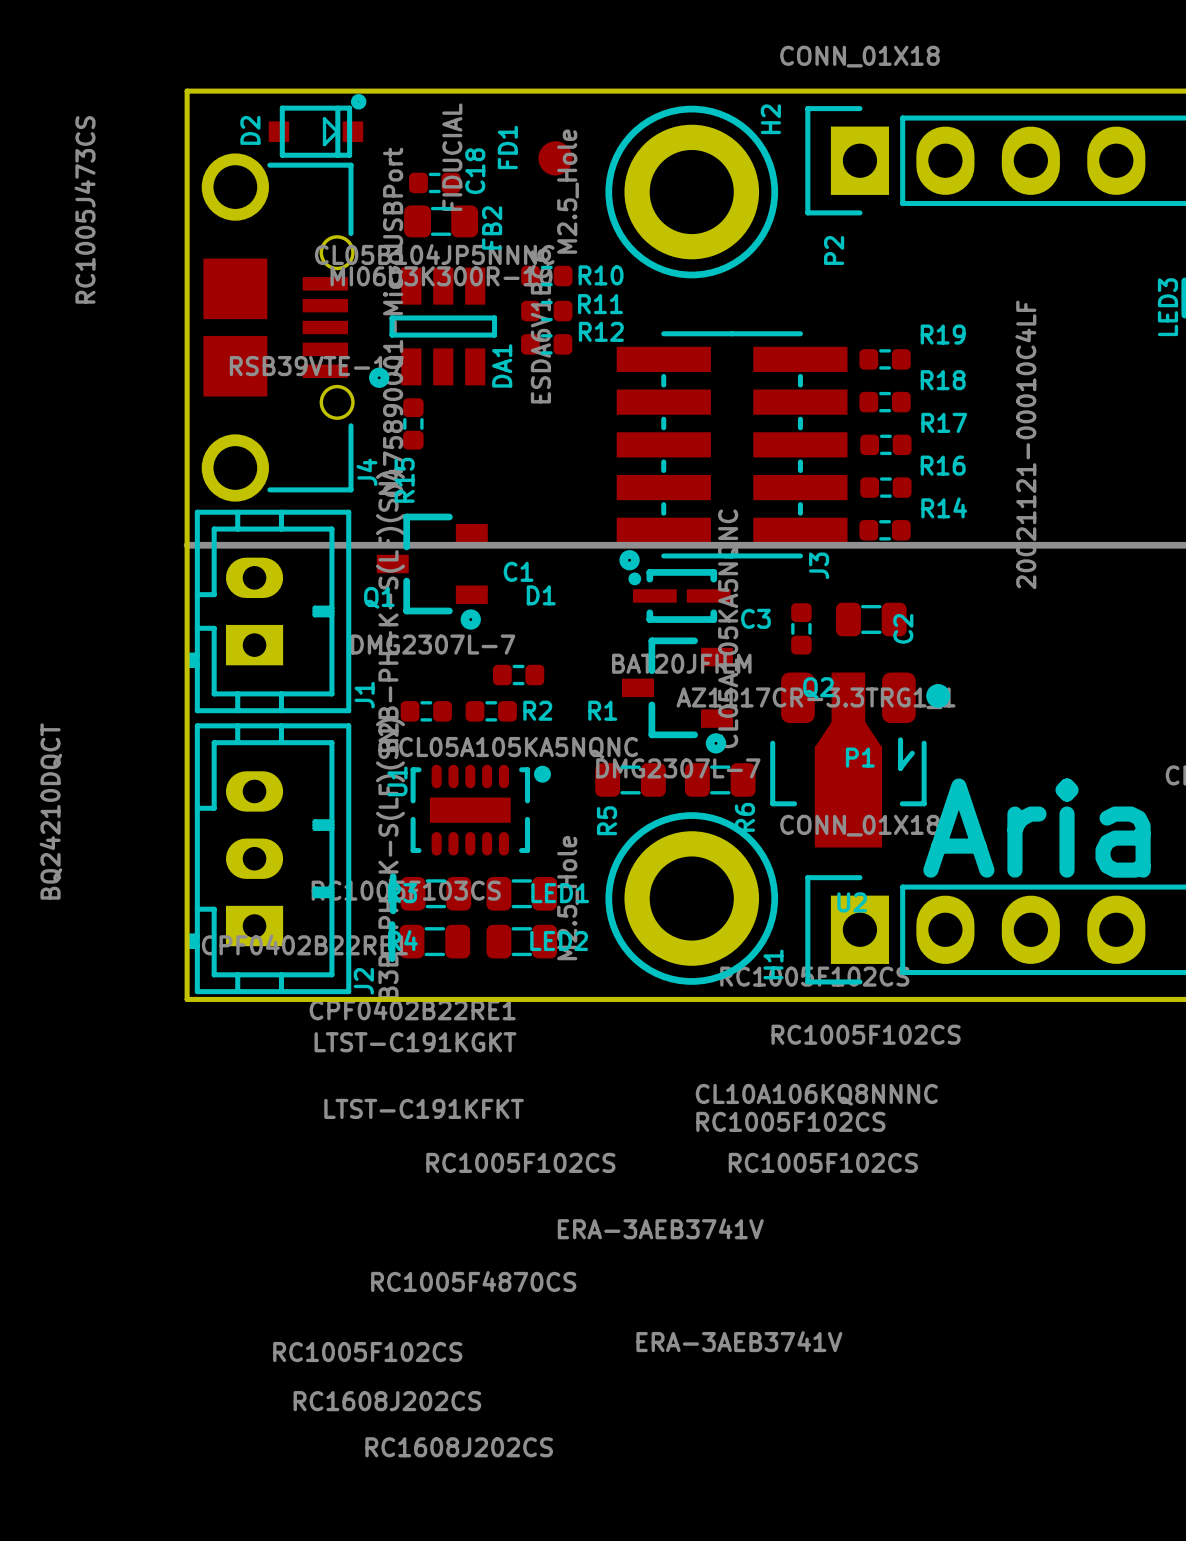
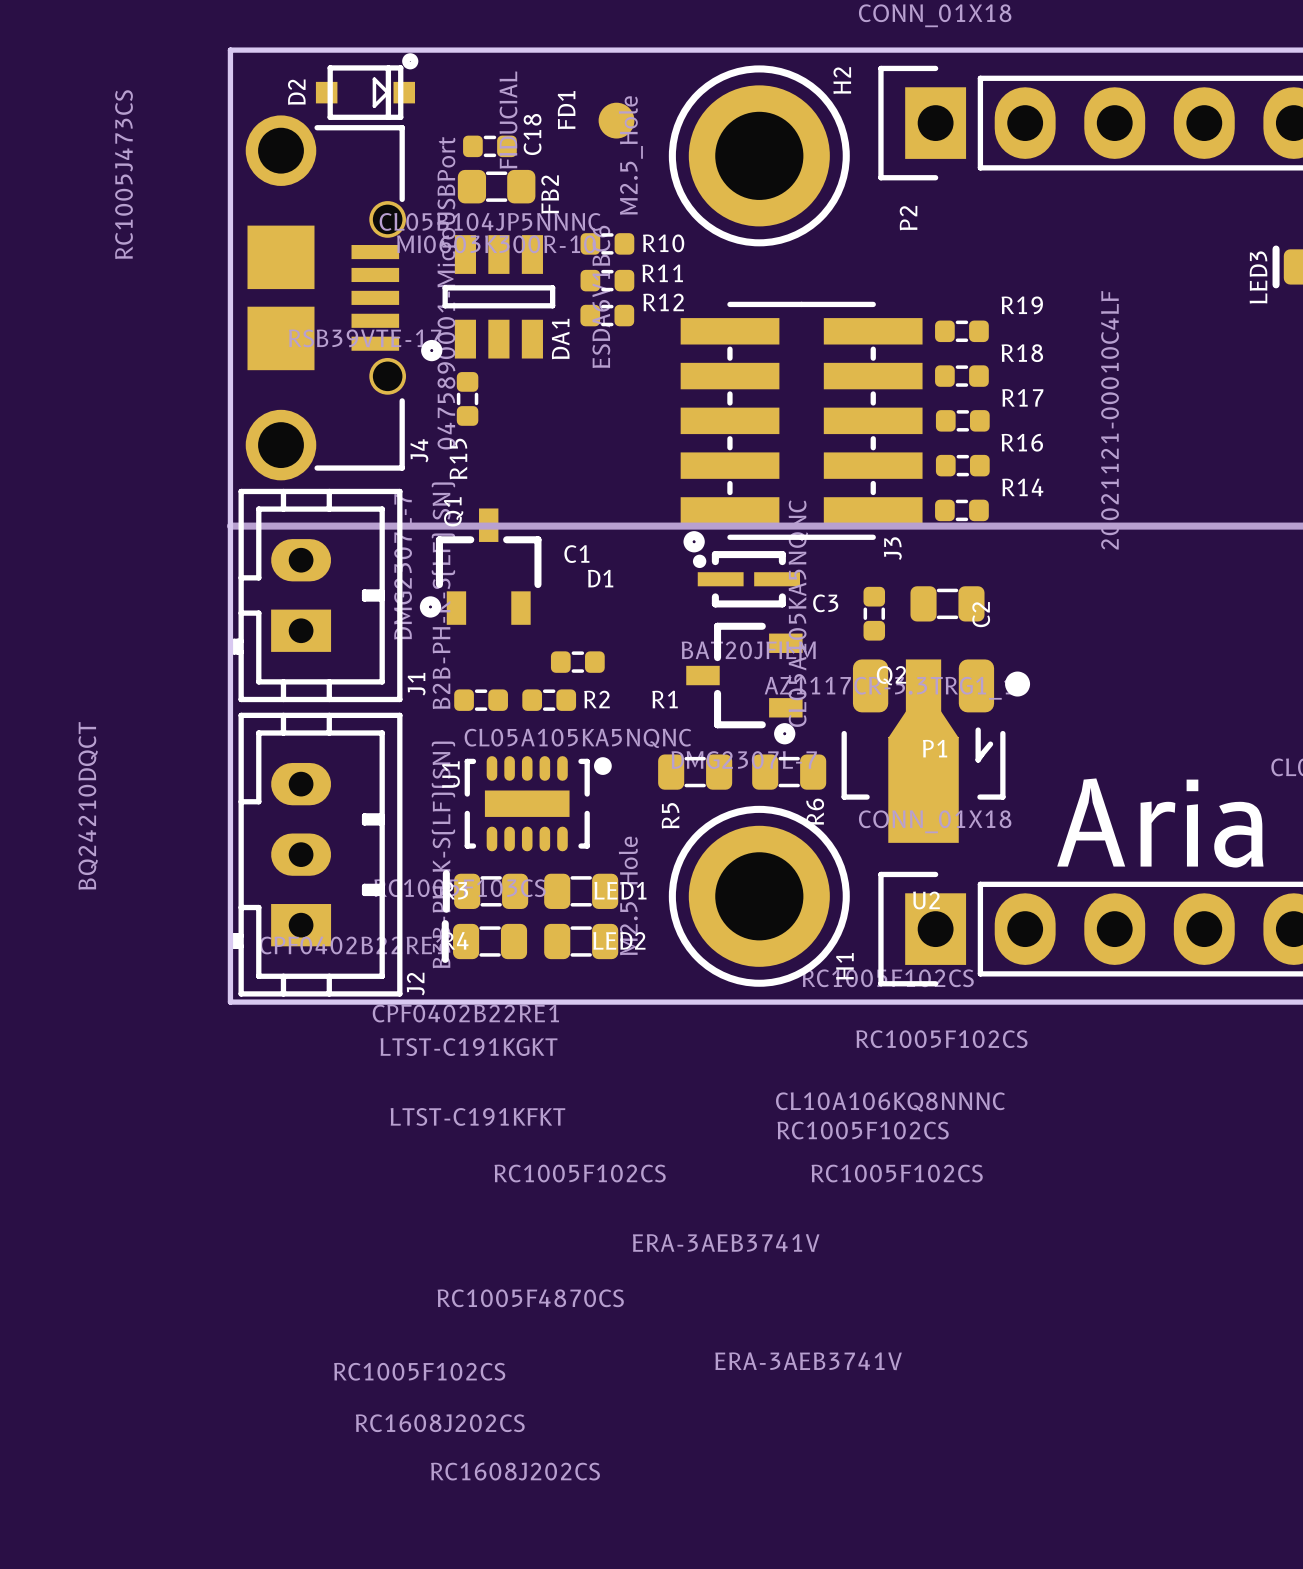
Q1 rotation: 0° (432, 571) -> 90° clockwise (480, 566)

